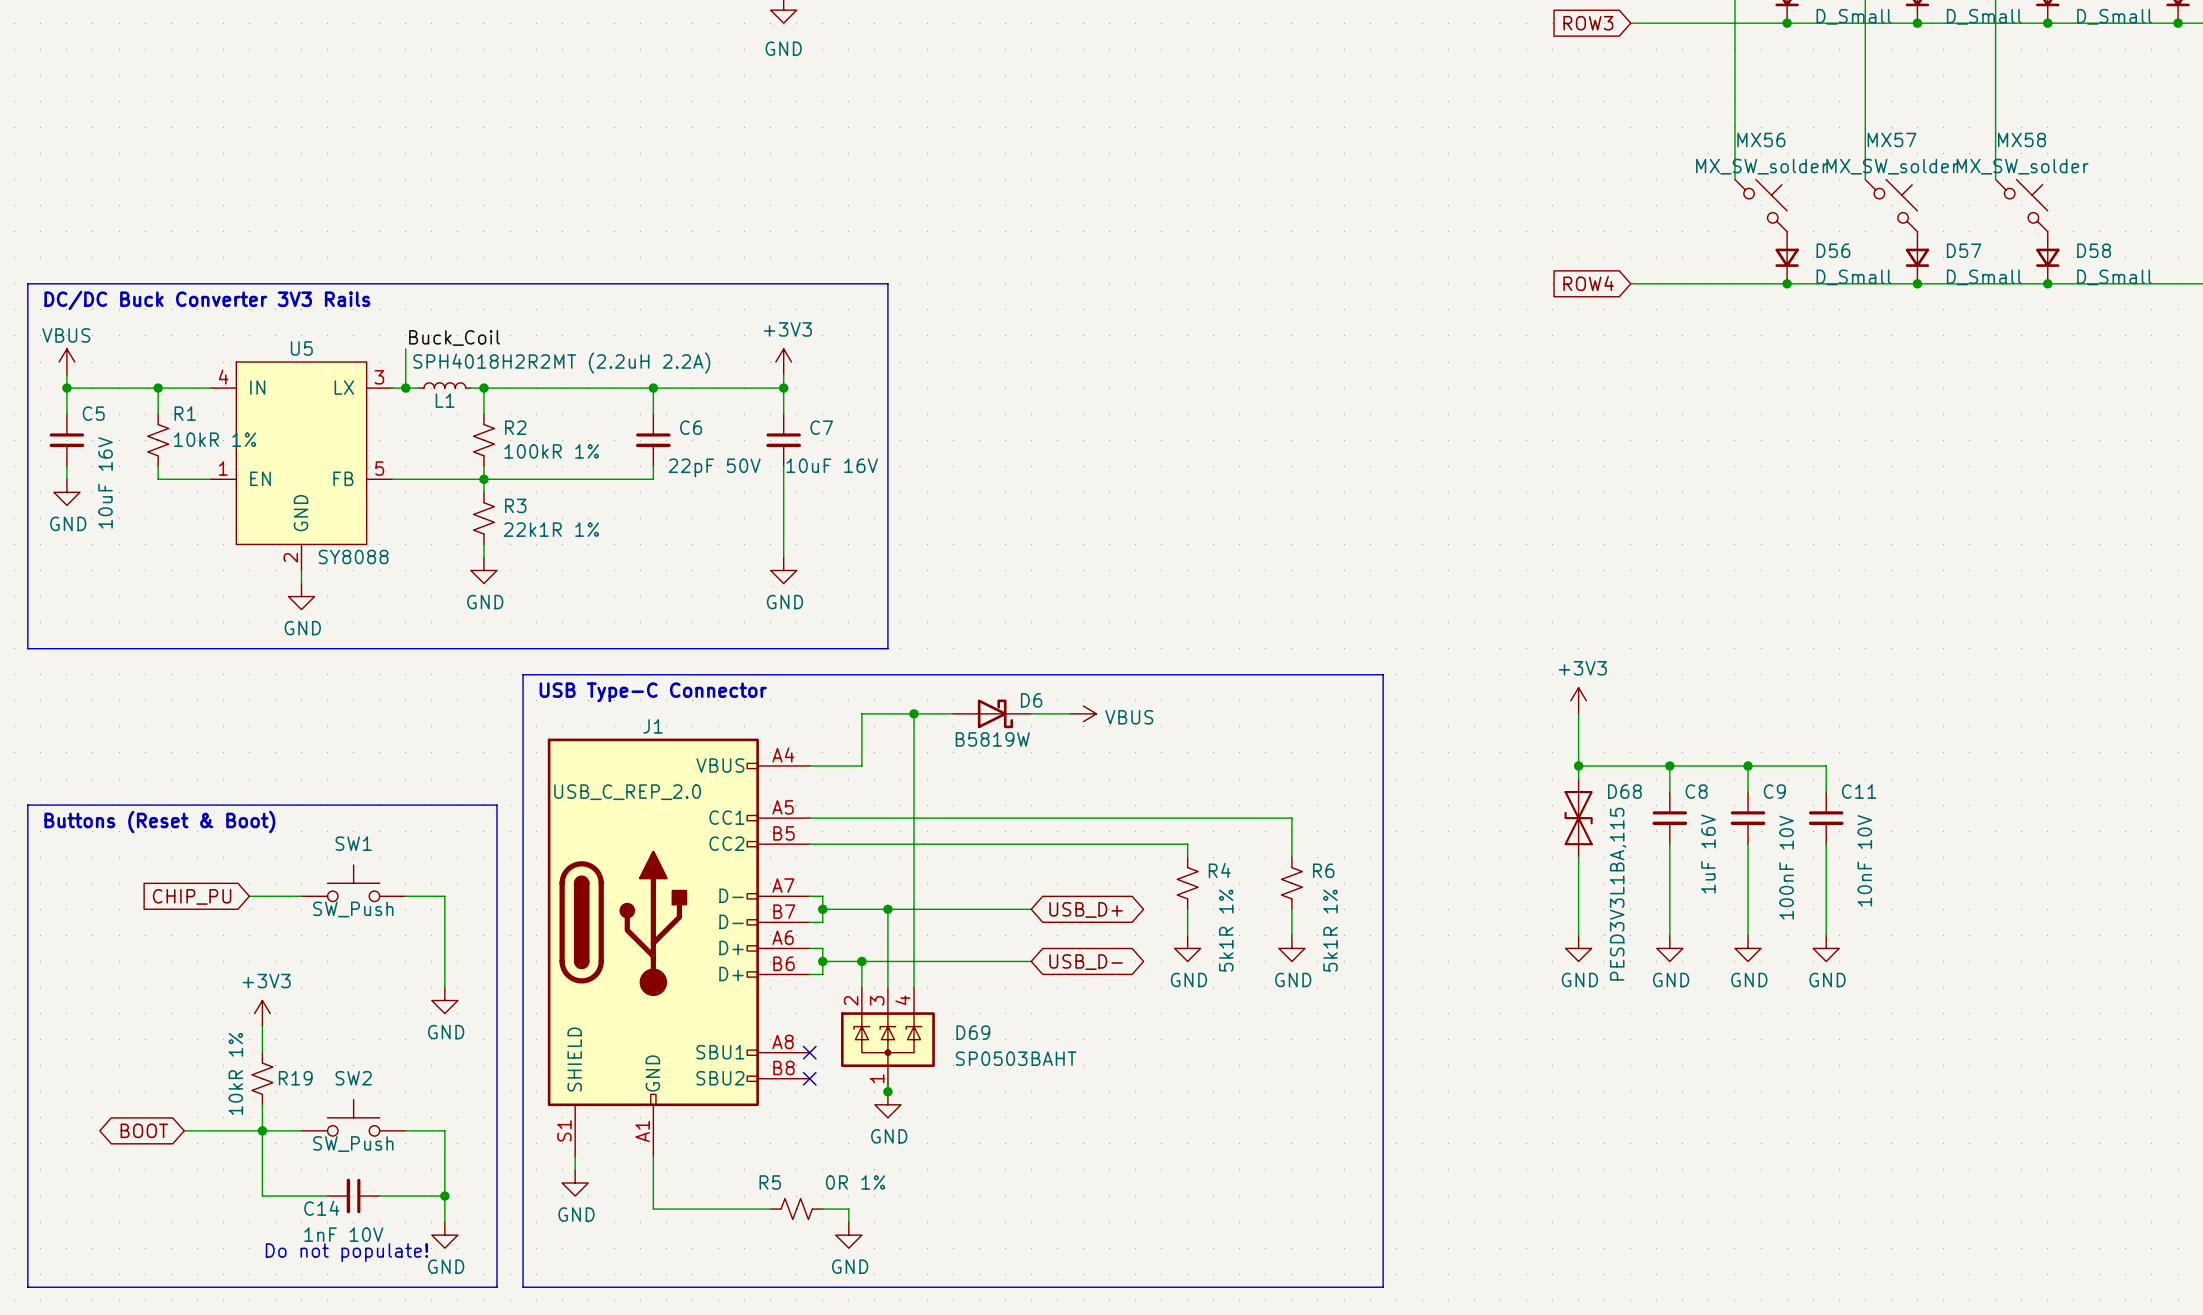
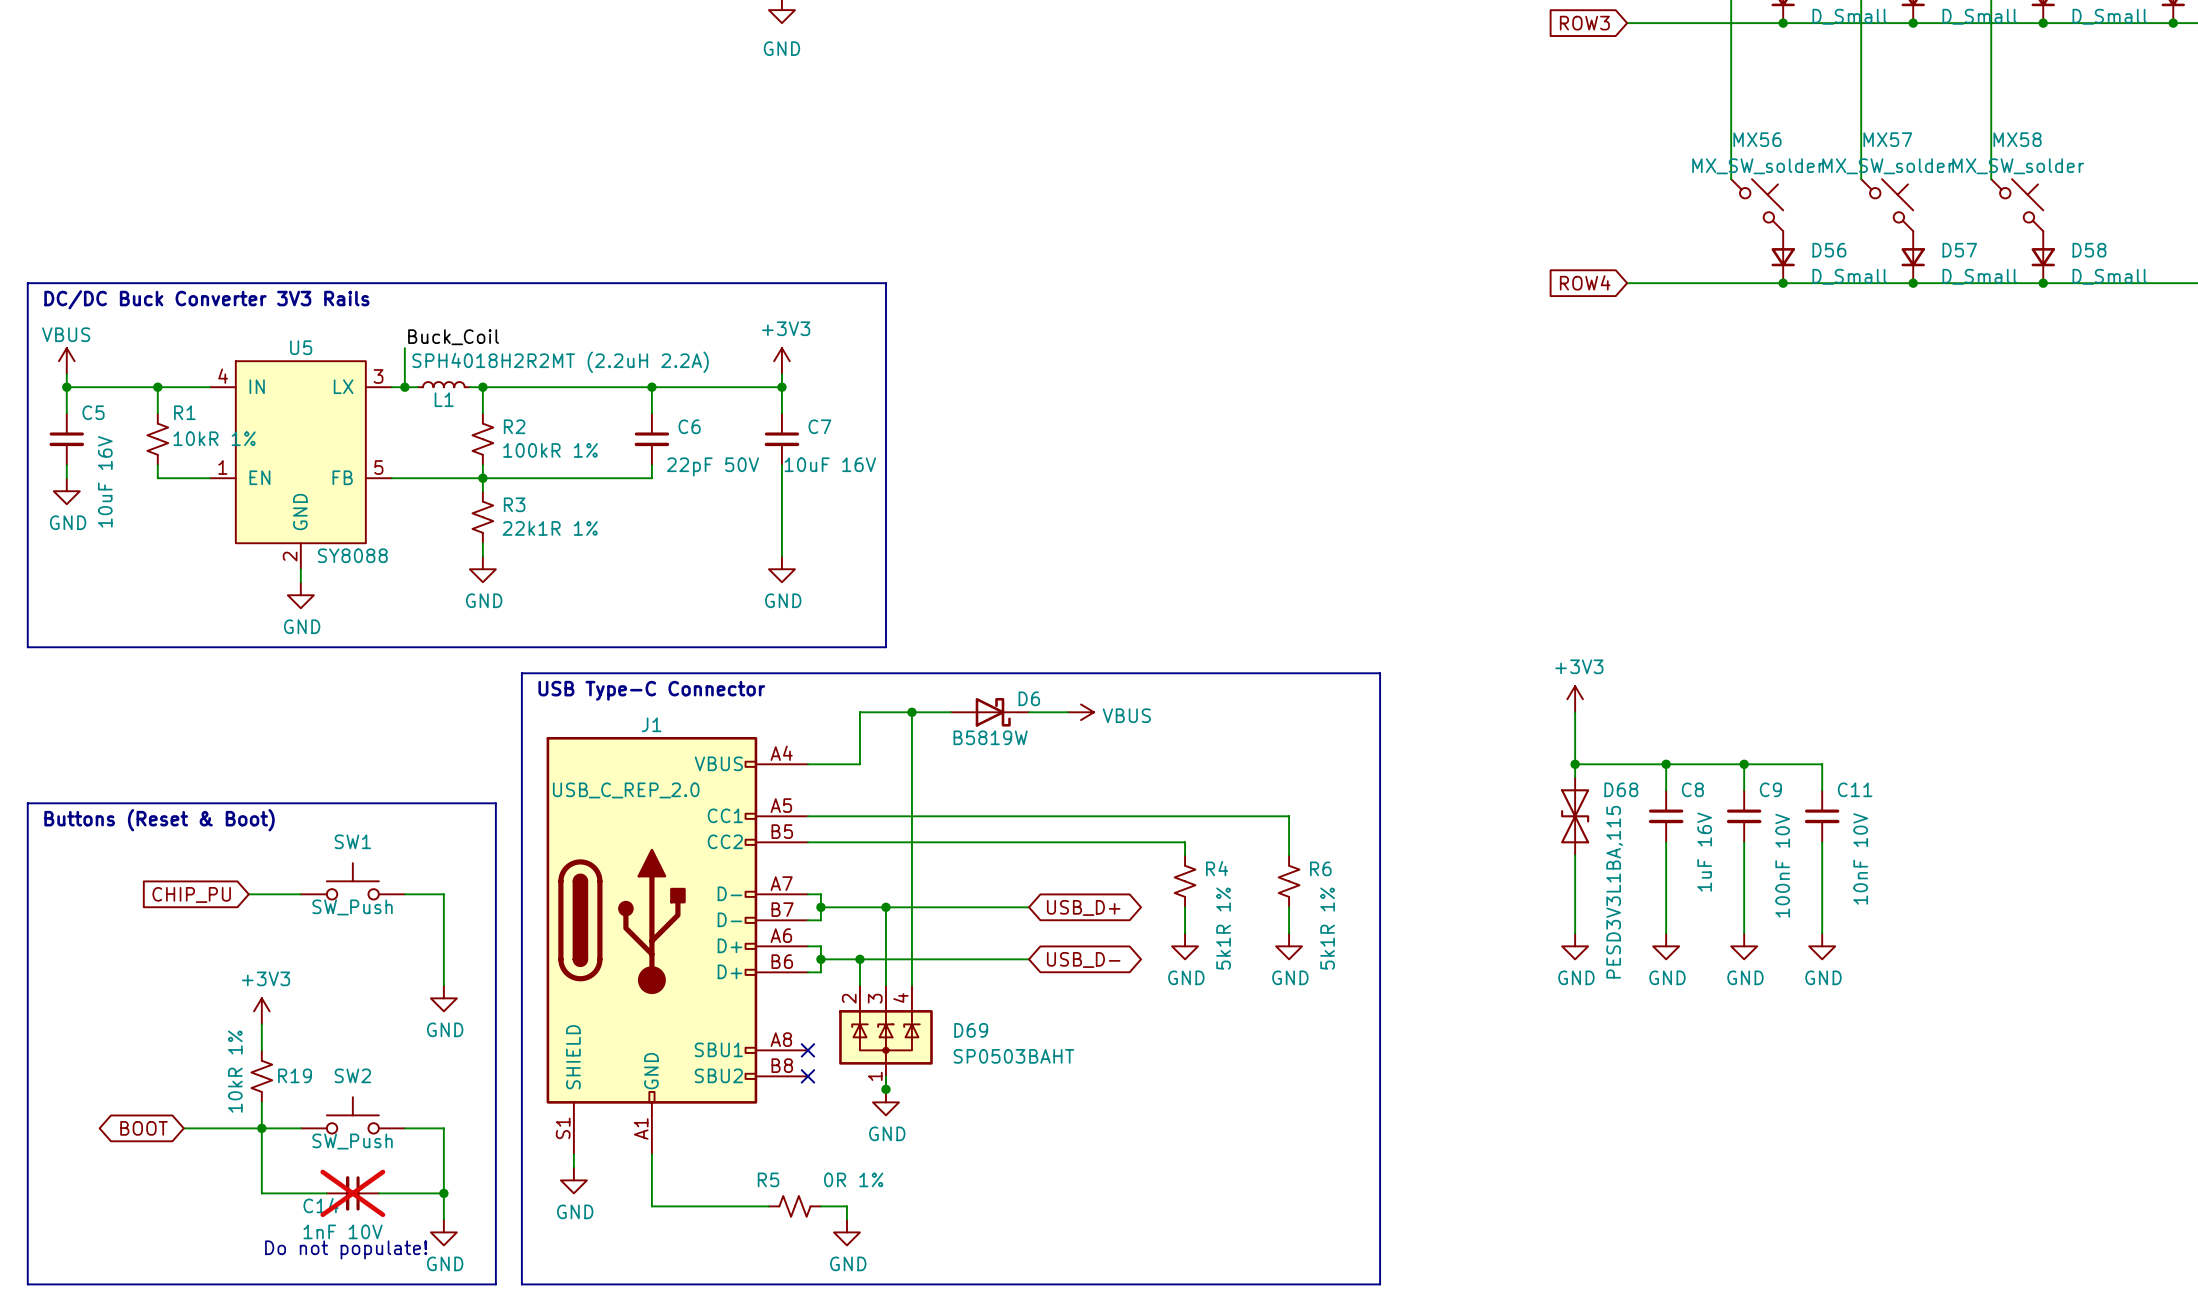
C14 do-not-place cross: none -> (352, 1193)

